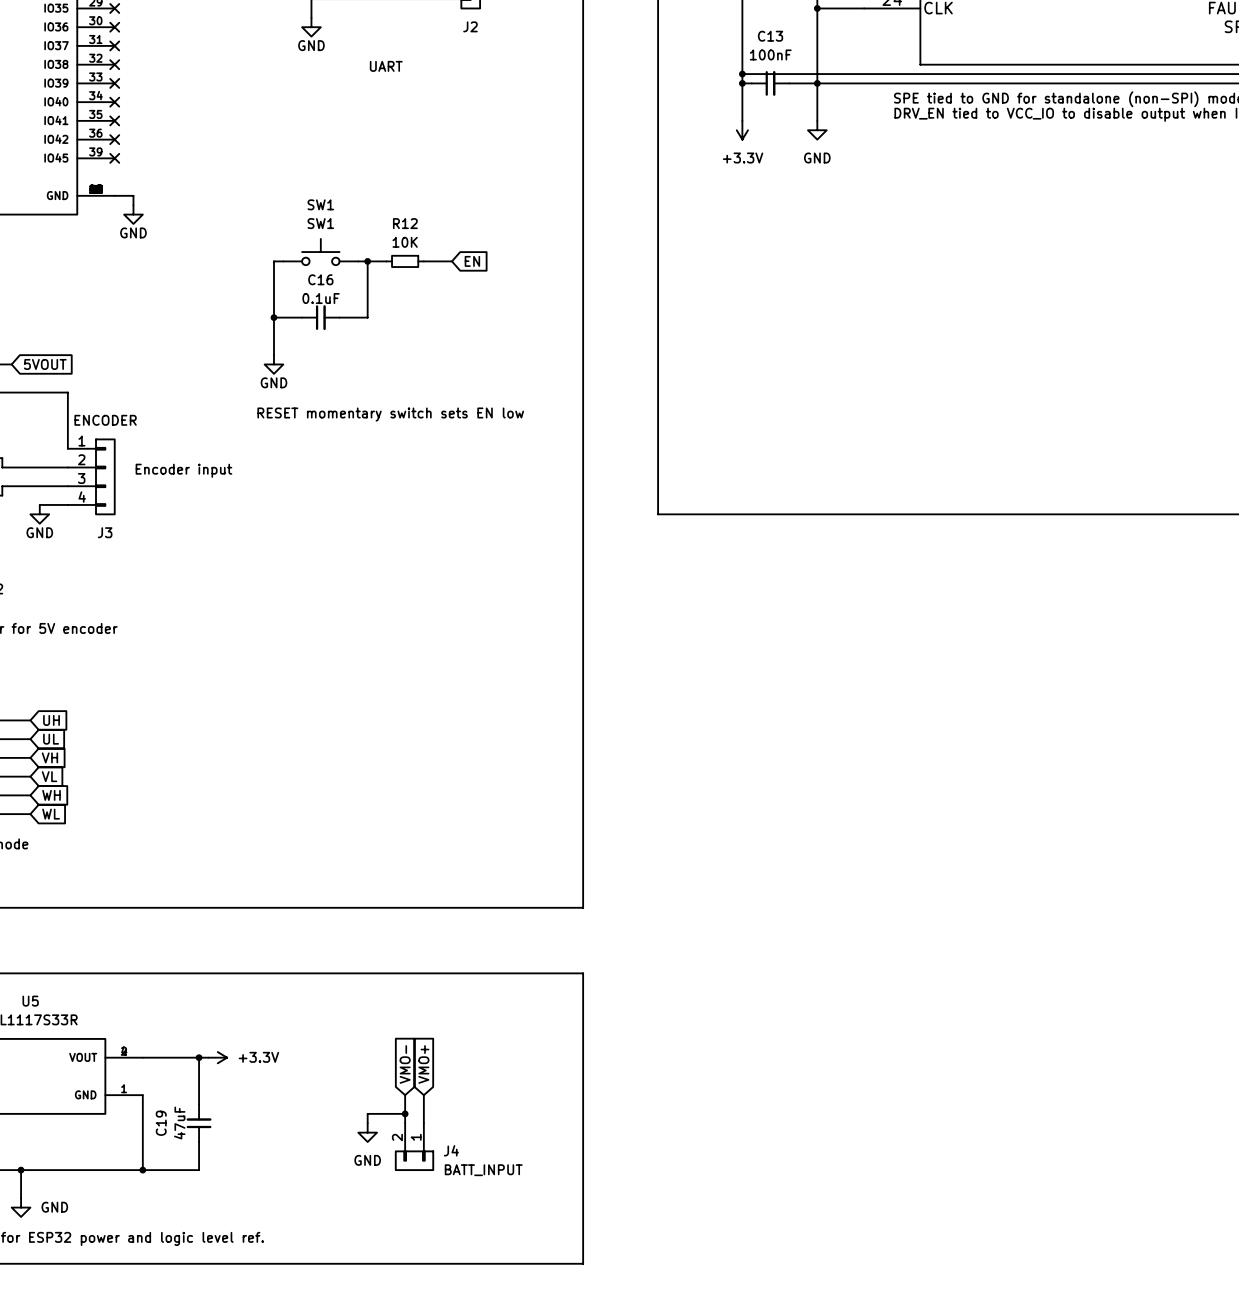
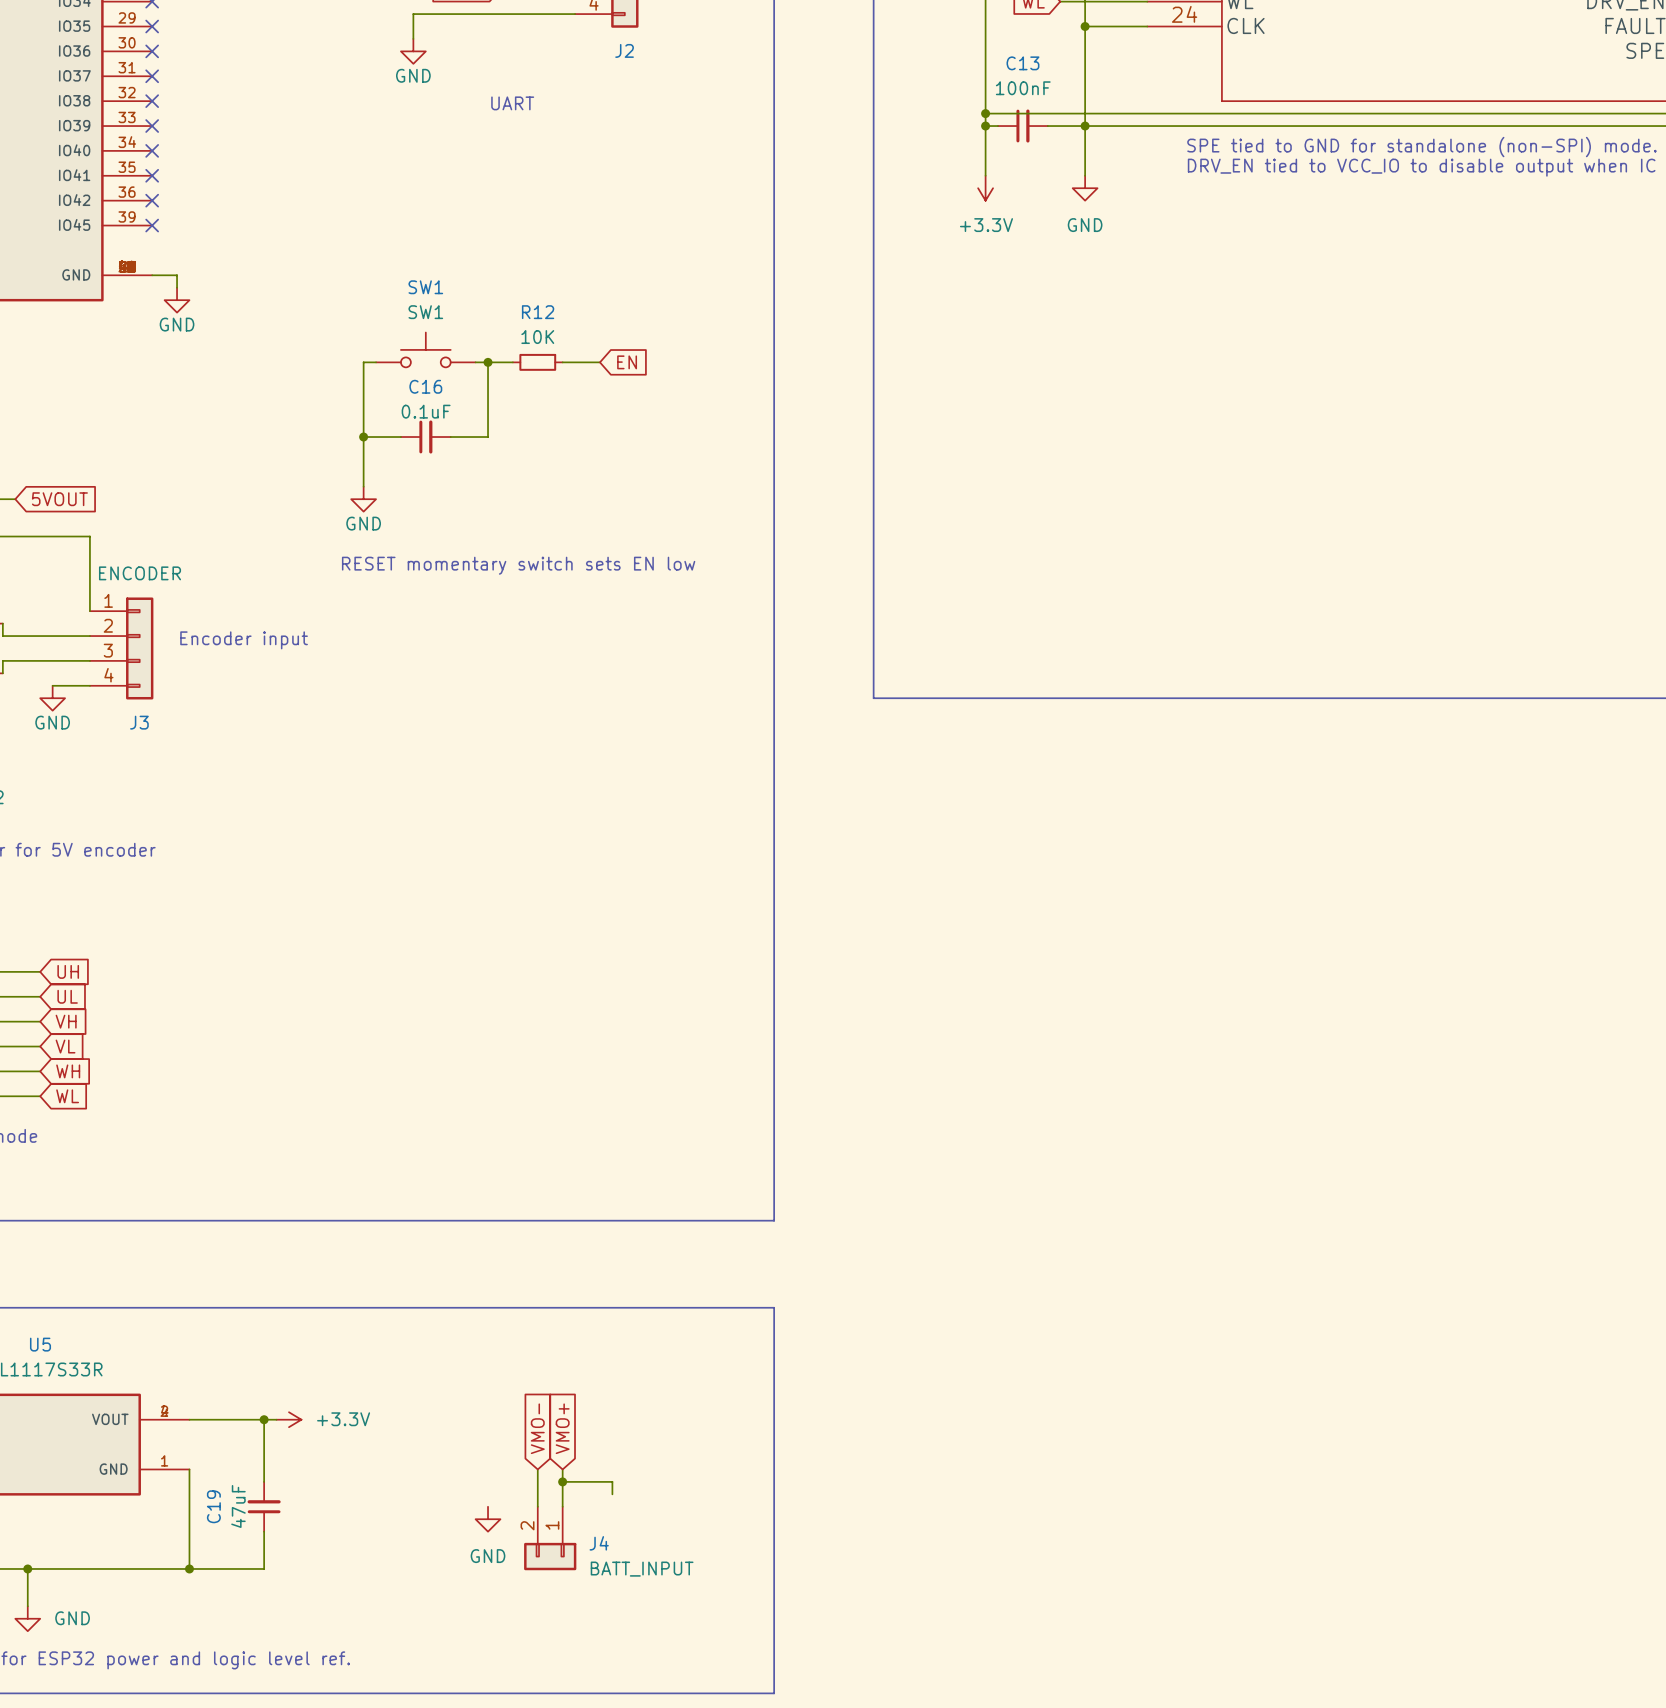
wire: none -> (562, 1481) (612, 1481) (612, 1494)
wire: (405, 1113) (367, 1113) (367, 1123) -> none
junction position: (405, 1113) -> (562, 1481)

